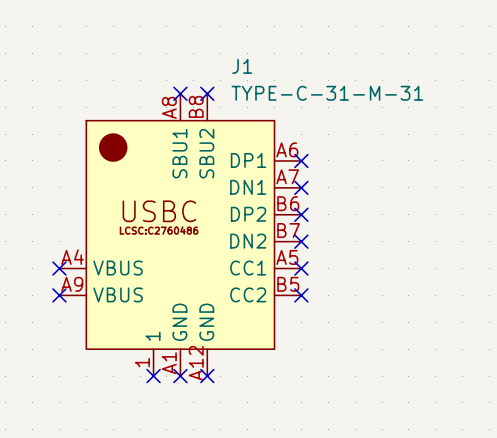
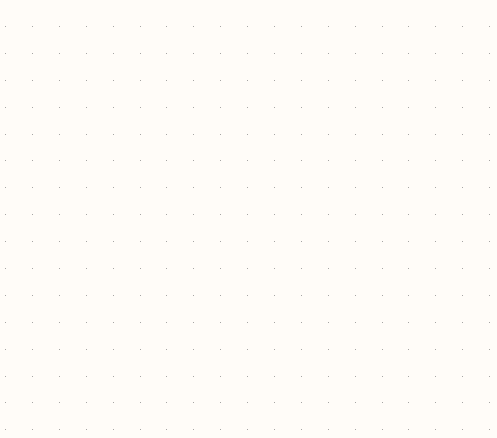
no-connect mark: (180, 93) -> none
no-connect mark: (207, 93) -> none
no-connect mark: (301, 160) -> none
no-connect mark: (301, 187) -> none
no-connect mark: (301, 214) -> none
J1: TYPE-C-31-M-31 (180, 234) -> none
no-connect mark: (301, 241) -> none
no-connect mark: (59, 268) -> none
no-connect mark: (301, 268) -> none
no-connect mark: (59, 295) -> none
no-connect mark: (301, 295) -> none
no-connect mark: (153, 376) -> none
no-connect mark: (180, 376) -> none
no-connect mark: (207, 376) -> none

